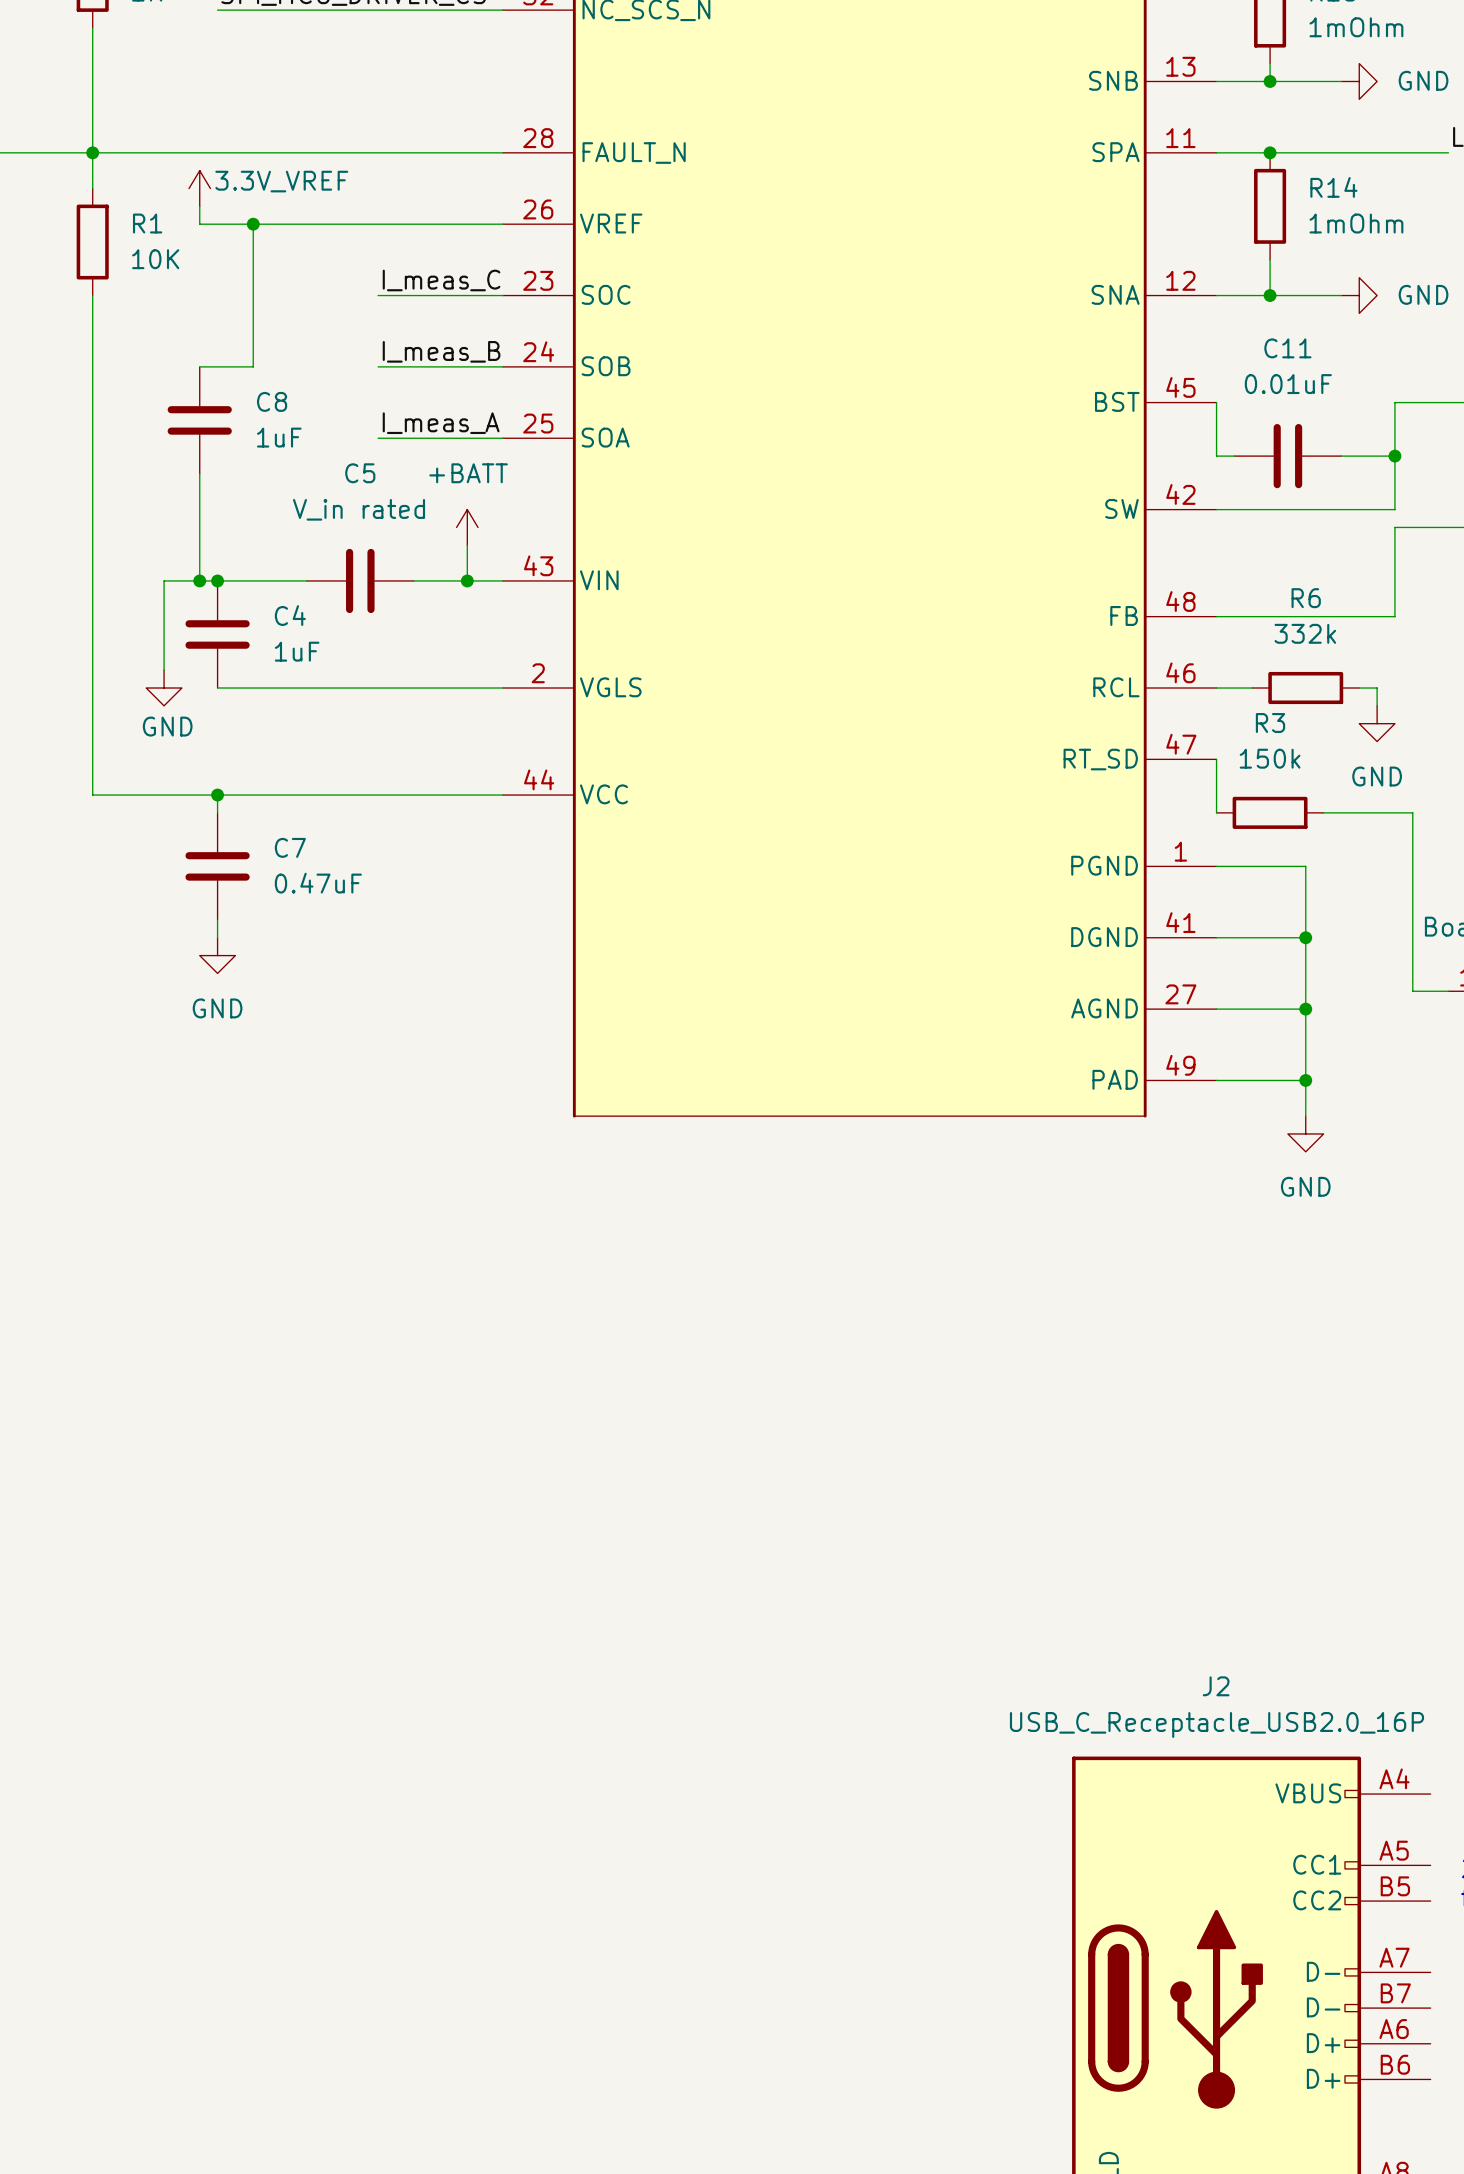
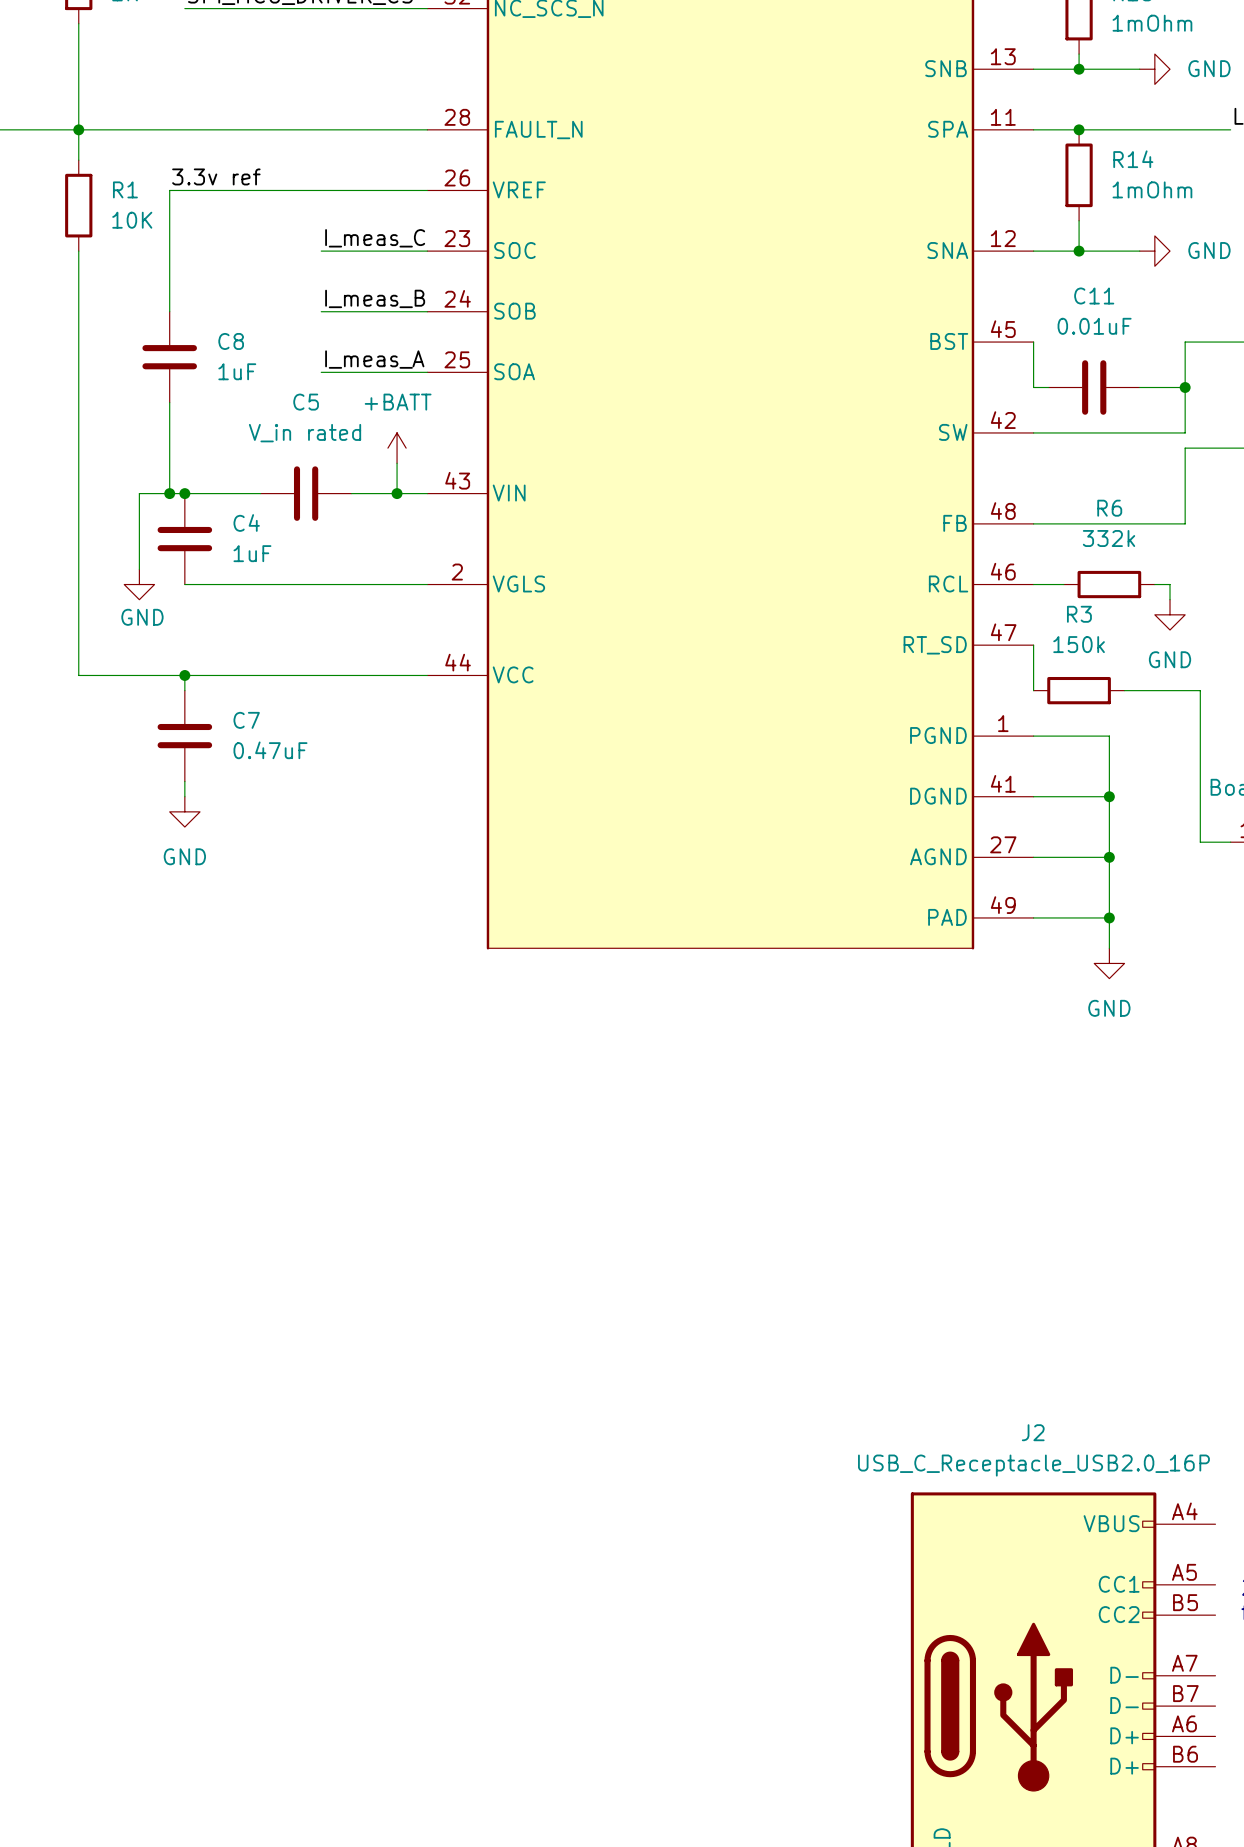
power symbol: 3.3V_VREF (199, 188) -> none
wire: (199, 206) (199, 224) -> none
label: none -> 3.3v ref (216, 176)
wire: (253, 224) (253, 366) (199, 366) -> (169, 190) (169, 311)
junction: (253, 224) -> none

